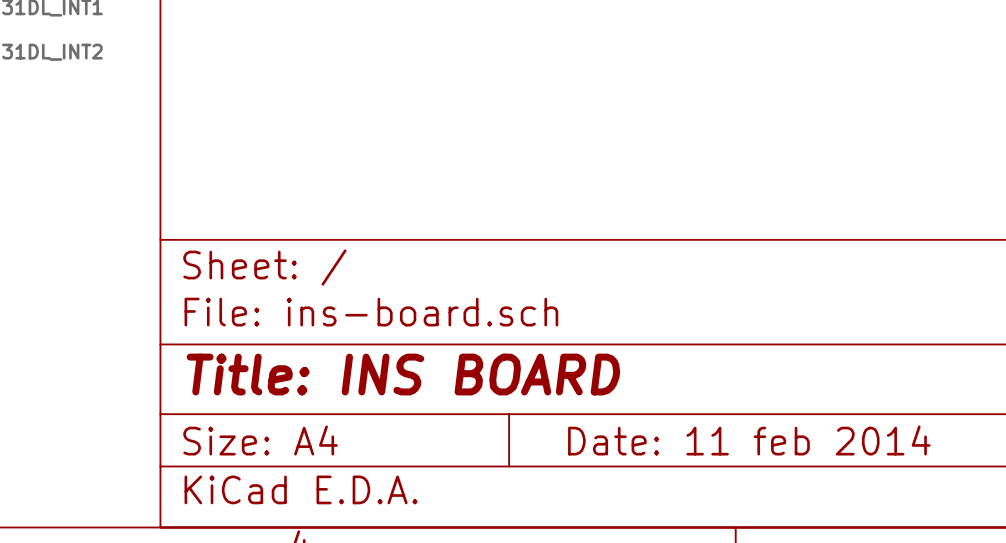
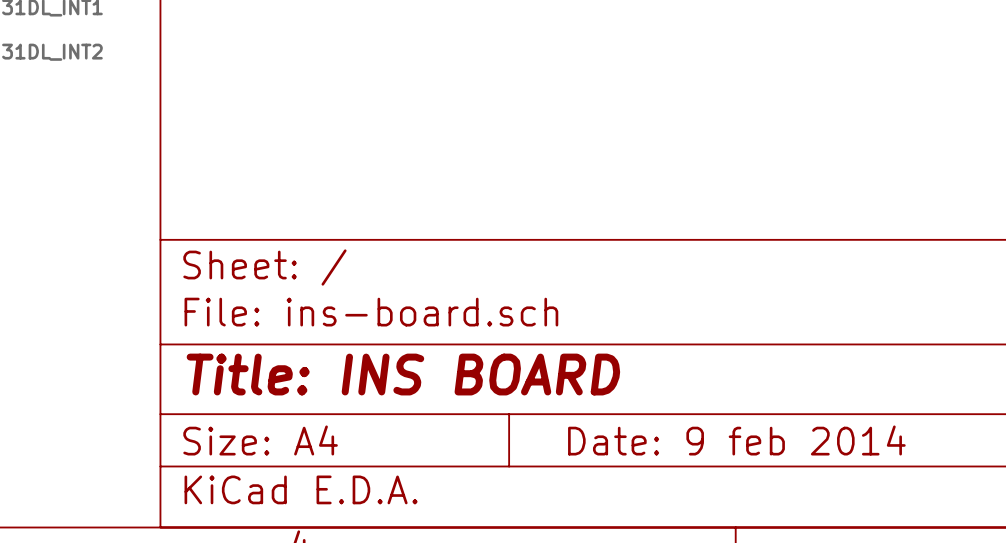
title block: Date: 11 feb 2014 (749, 440) -> Date: 9 feb 2014 (736, 440)

